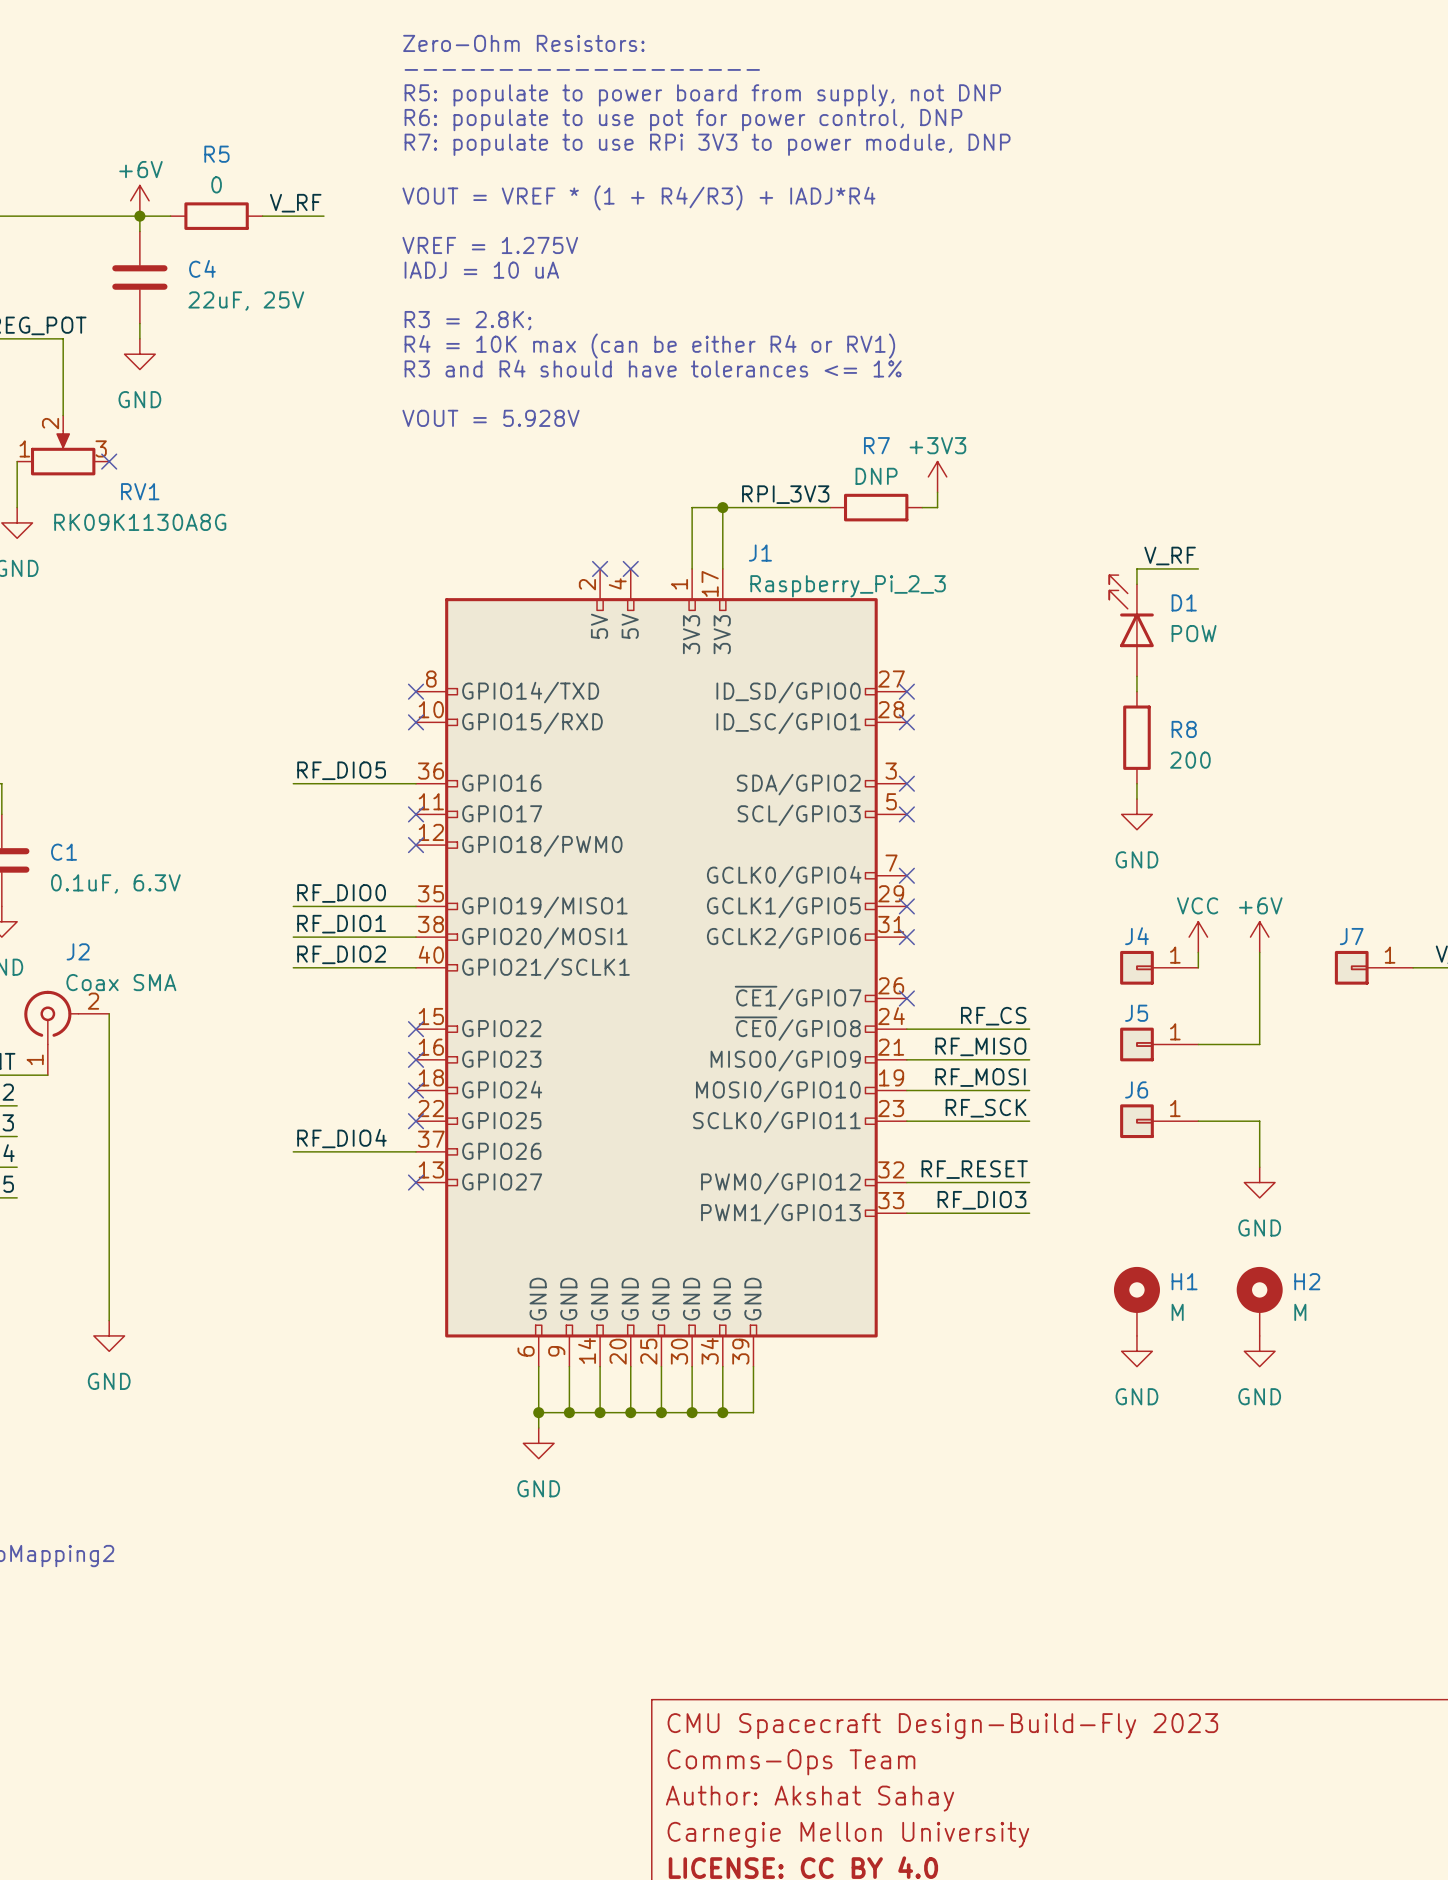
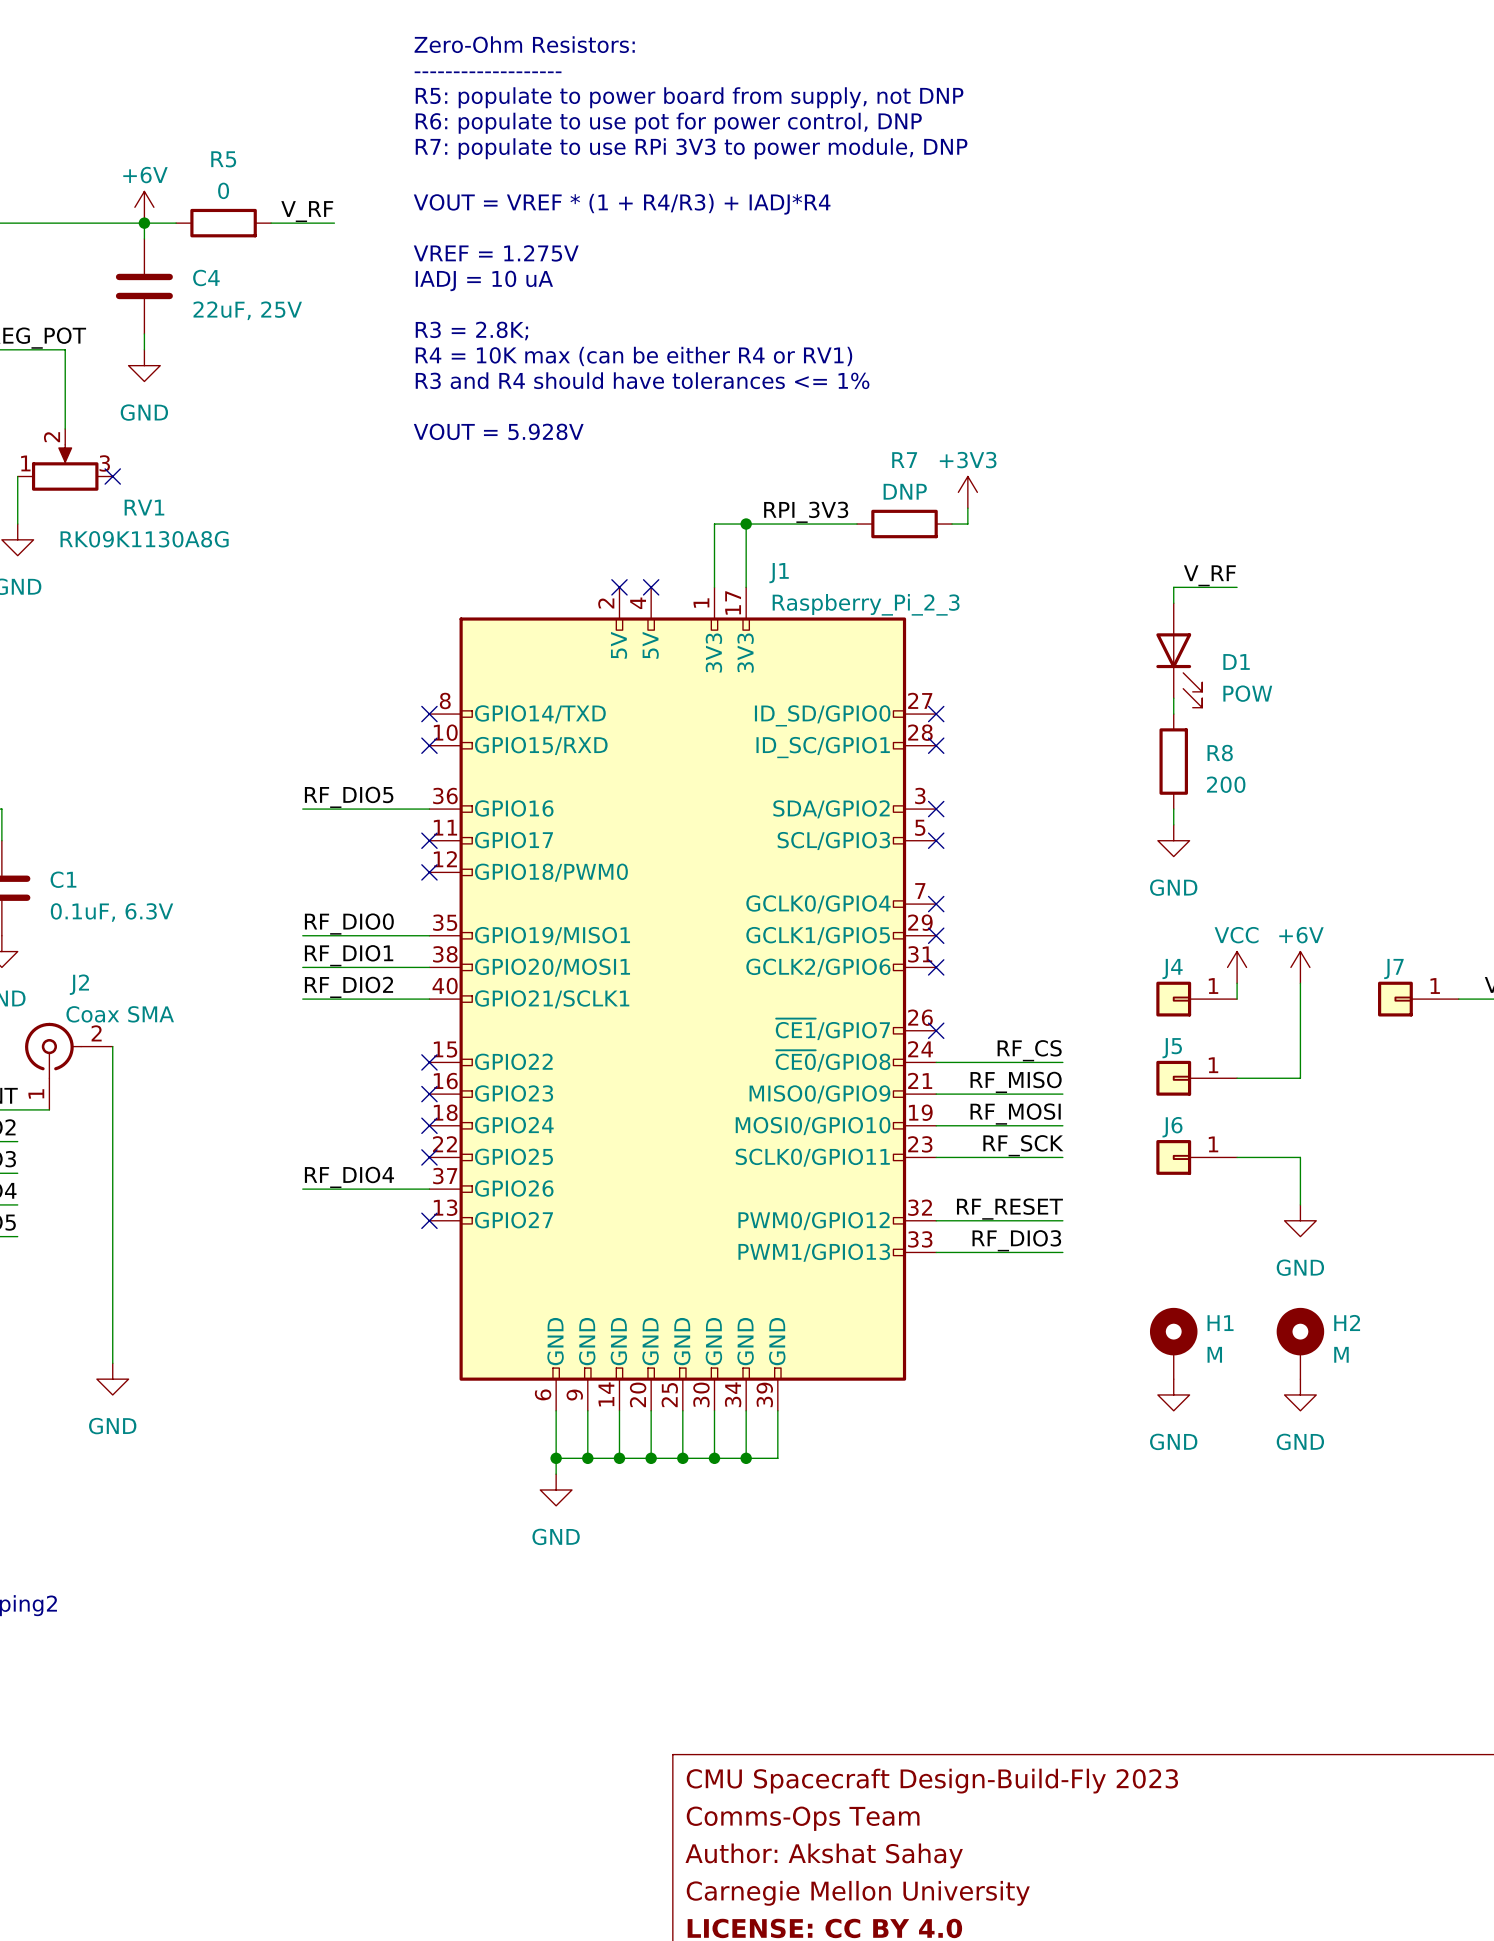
D1 name position: D1 (1184, 602) -> D1 (1236, 661)
D1 rotation: 0° (1131, 611) -> 180° (1179, 670)
D1 value position: POW (1194, 633) -> POW (1247, 693)

